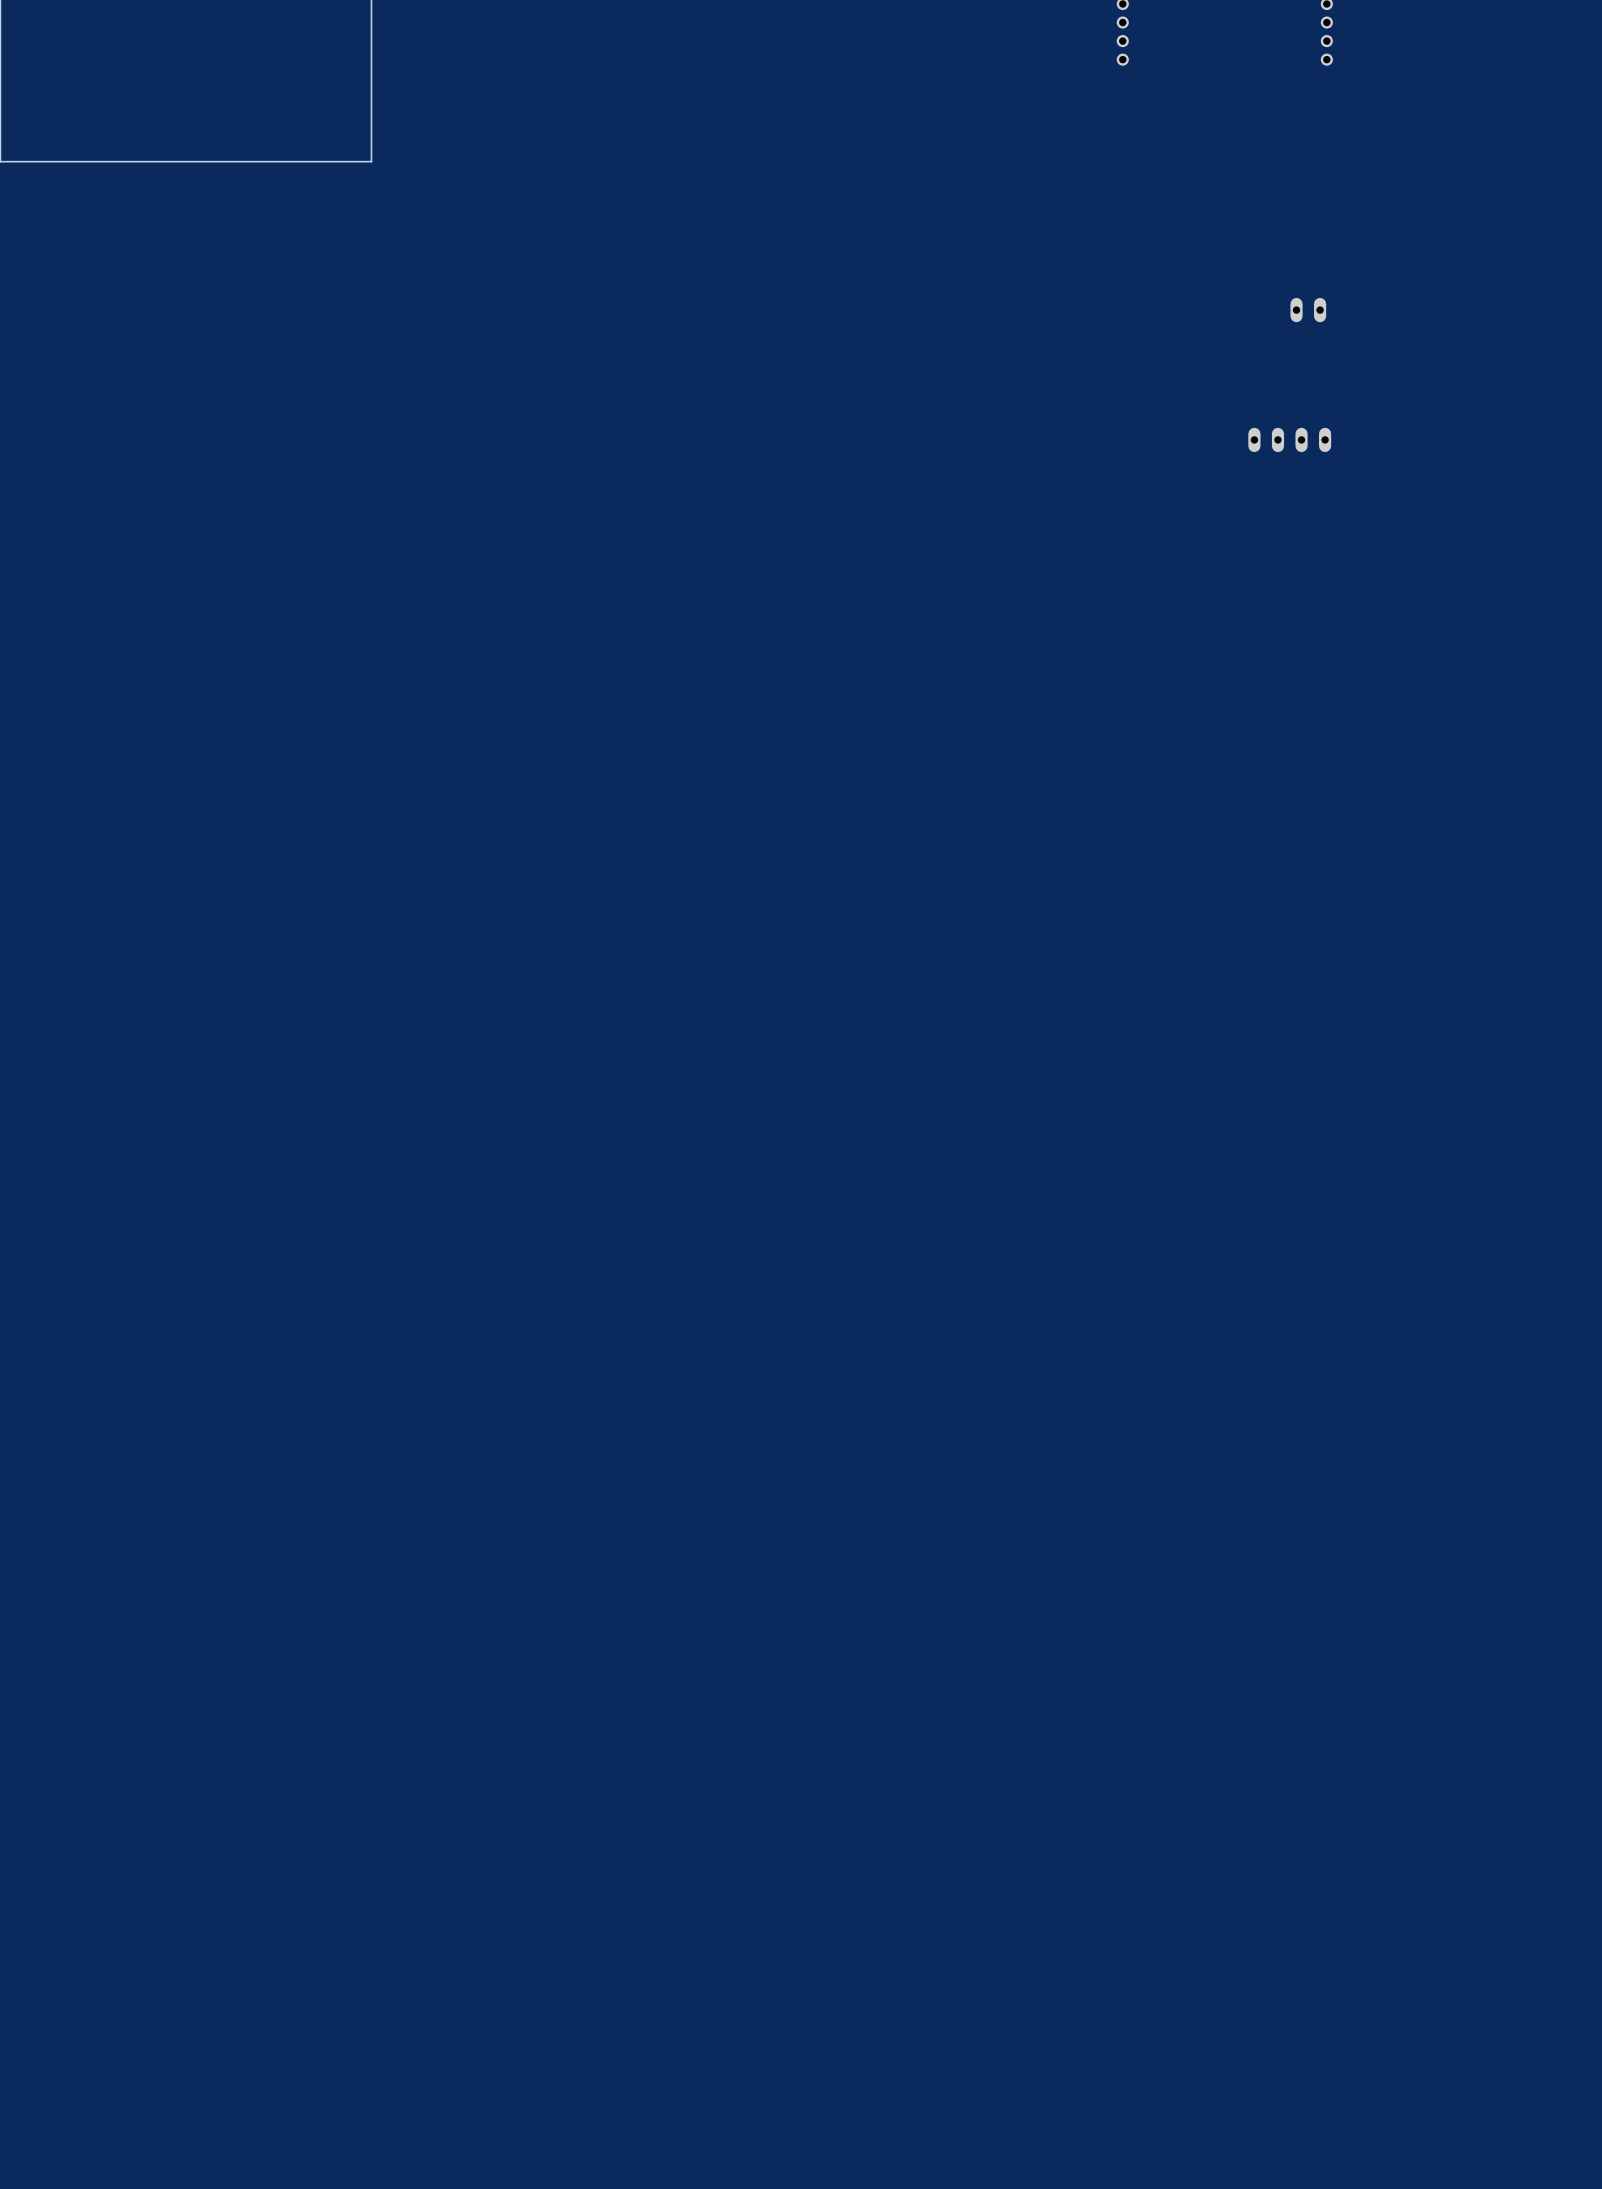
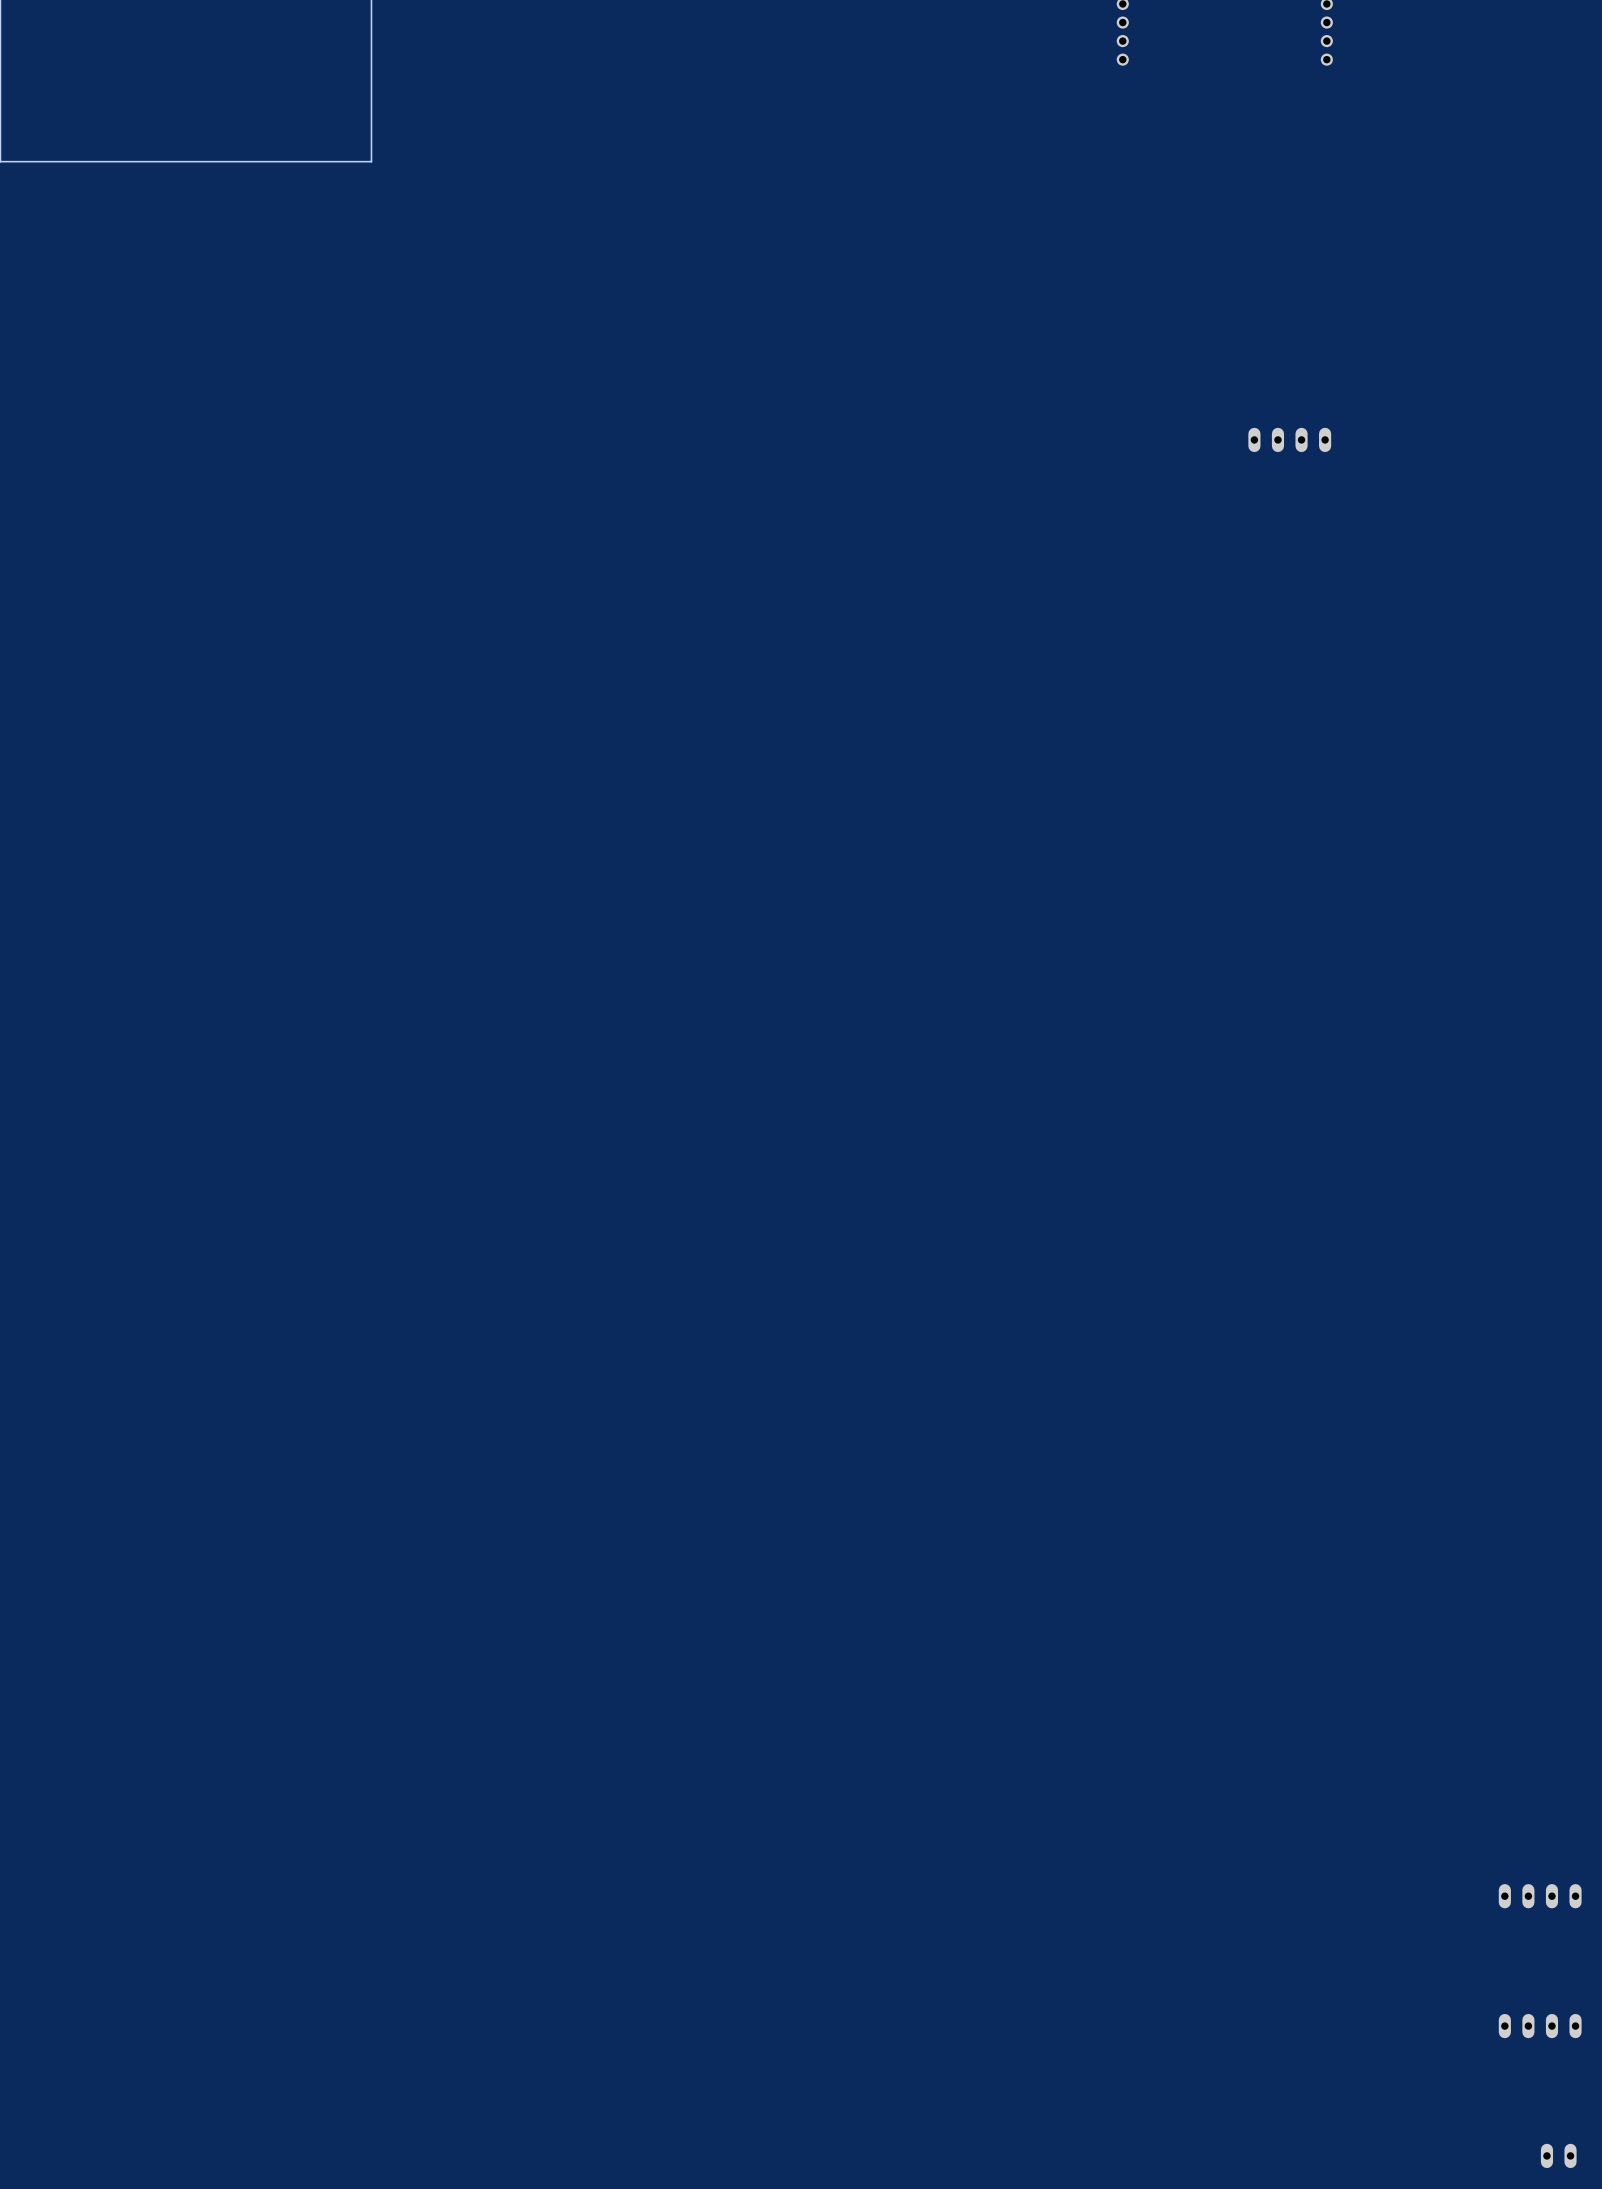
part: (1308, 310) -> none
part: none -> (1540, 1896)
part: none -> (1540, 2026)
part: none -> (1558, 2155)

